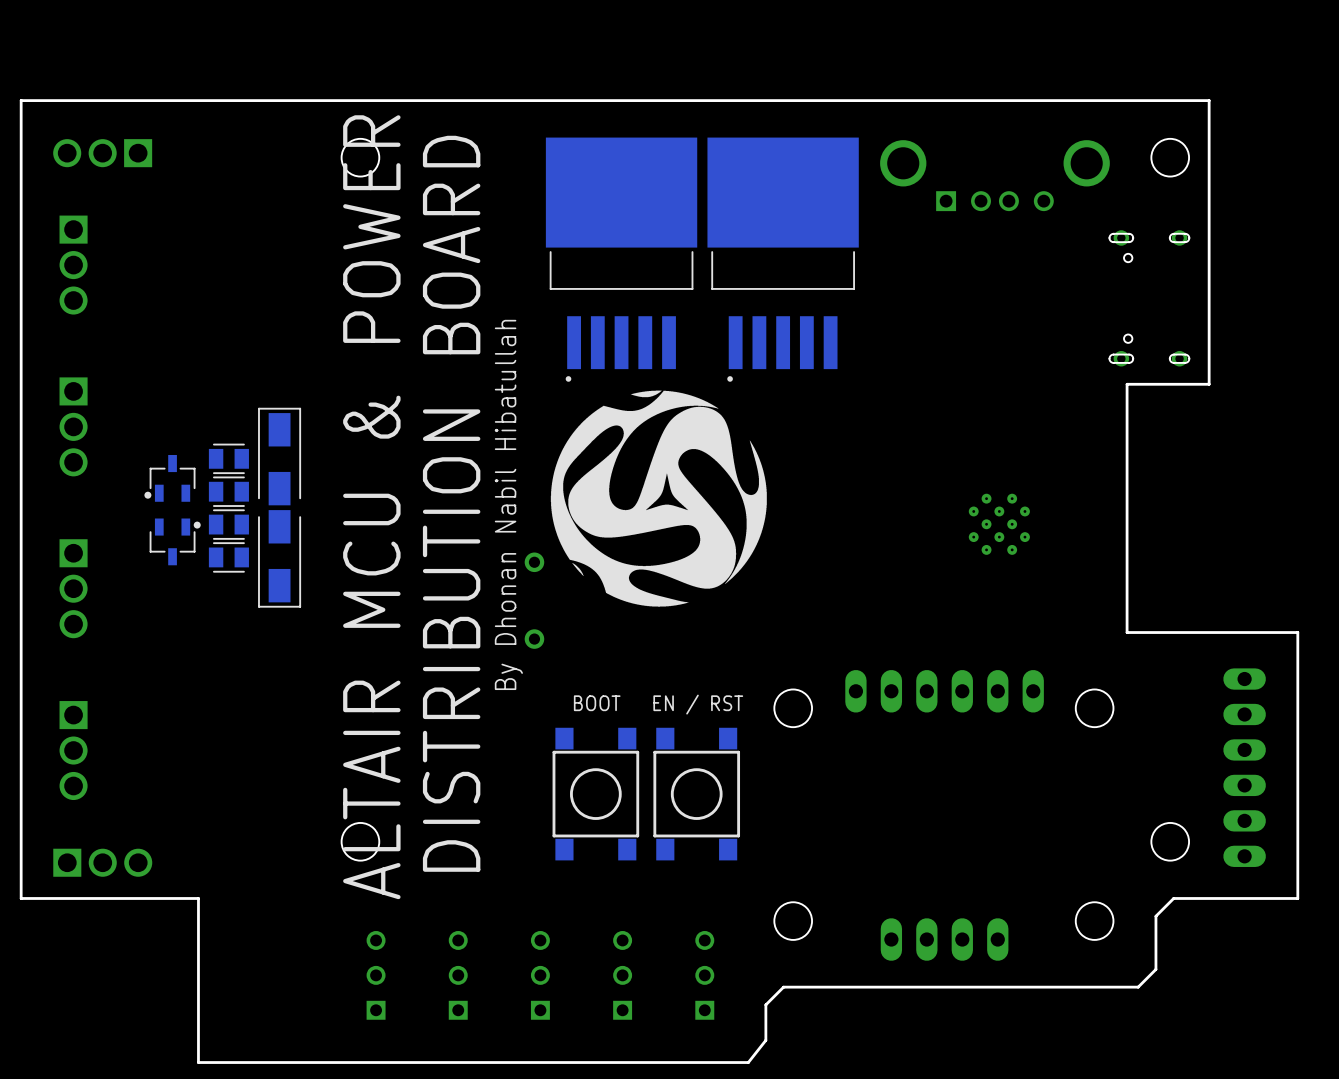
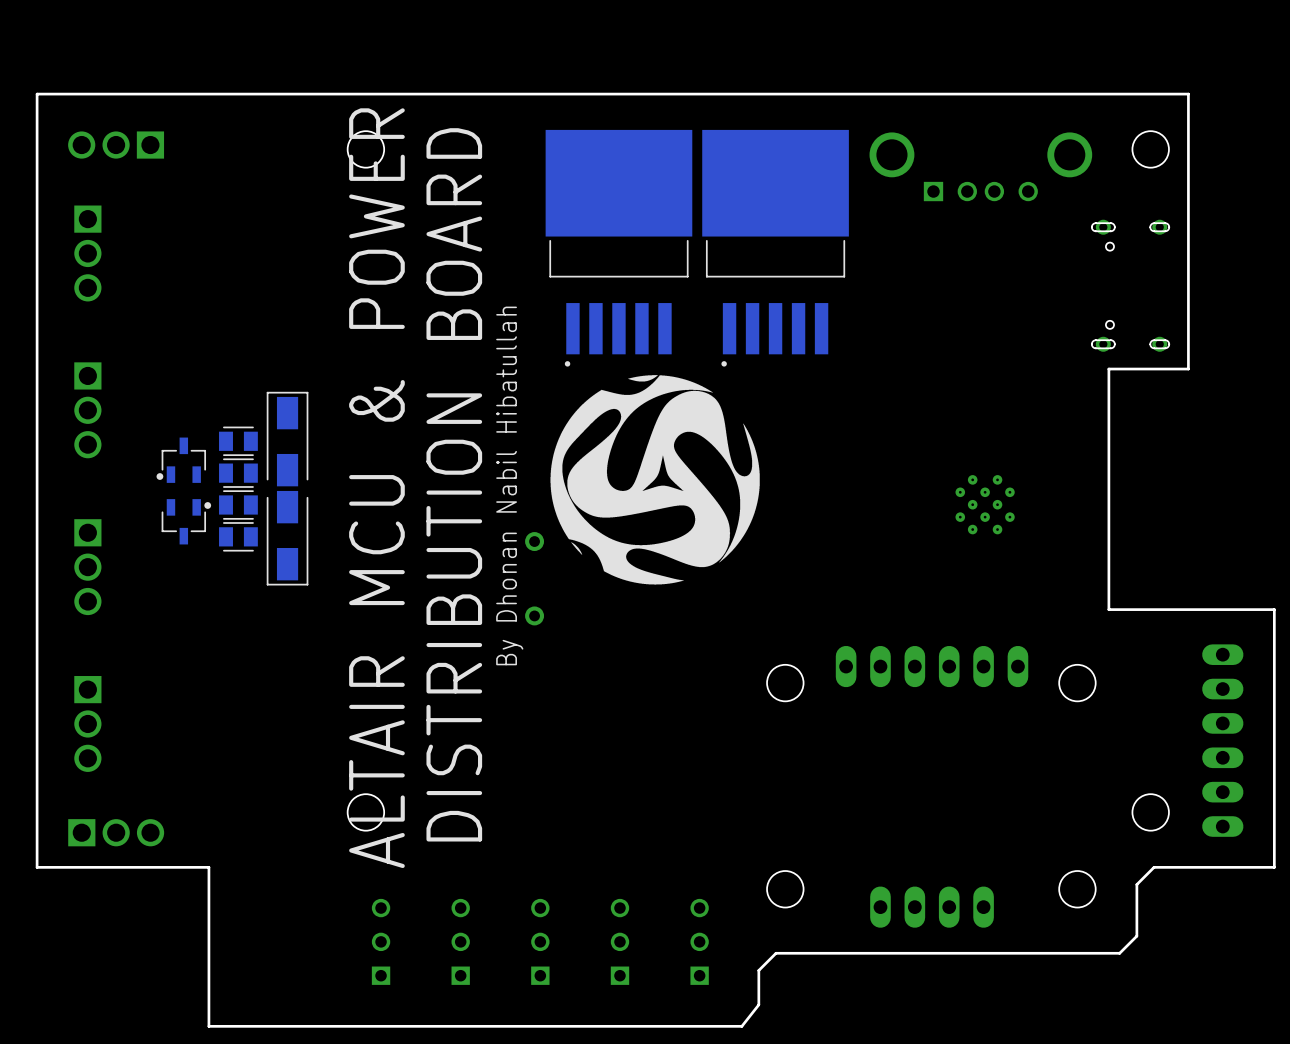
text: BOOT (597, 703) -> none
text: EN / RST (698, 704) -> none
part: (595, 794) -> none
part: (696, 794) -> none

